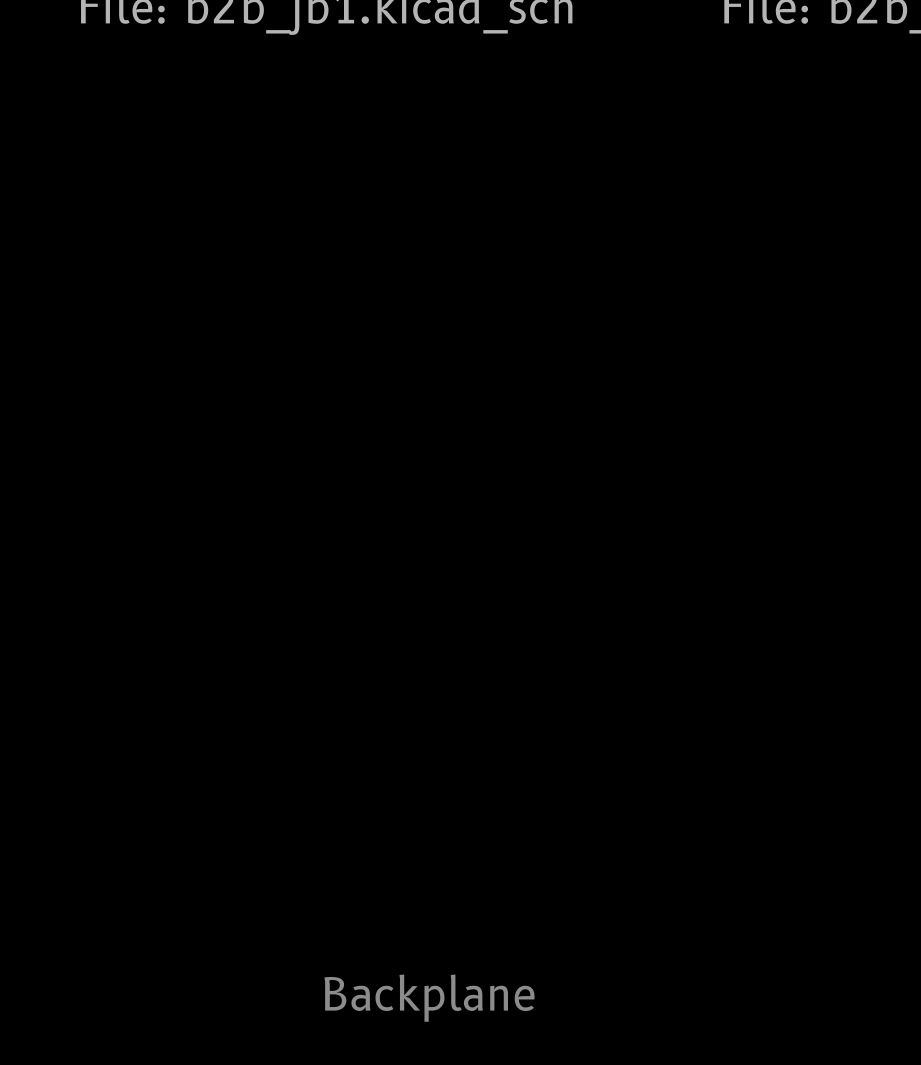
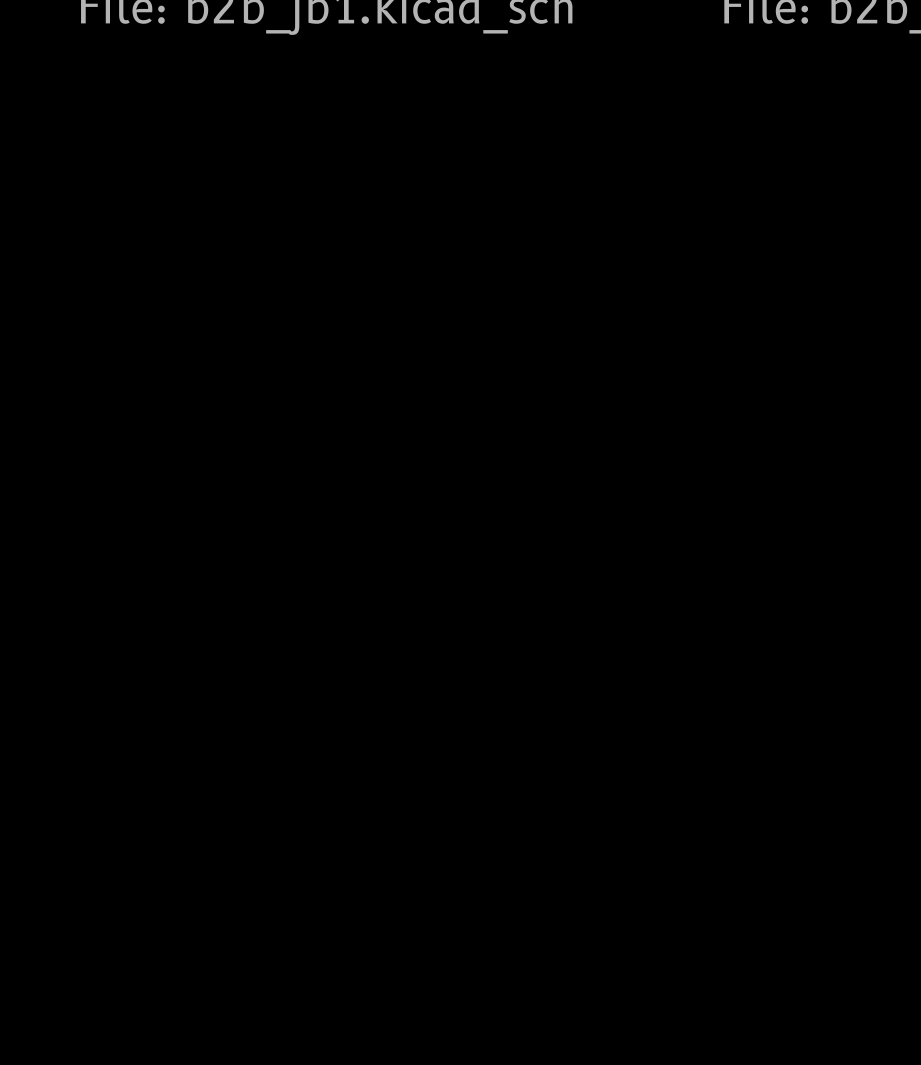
text: Backplane (429, 998) -> none

